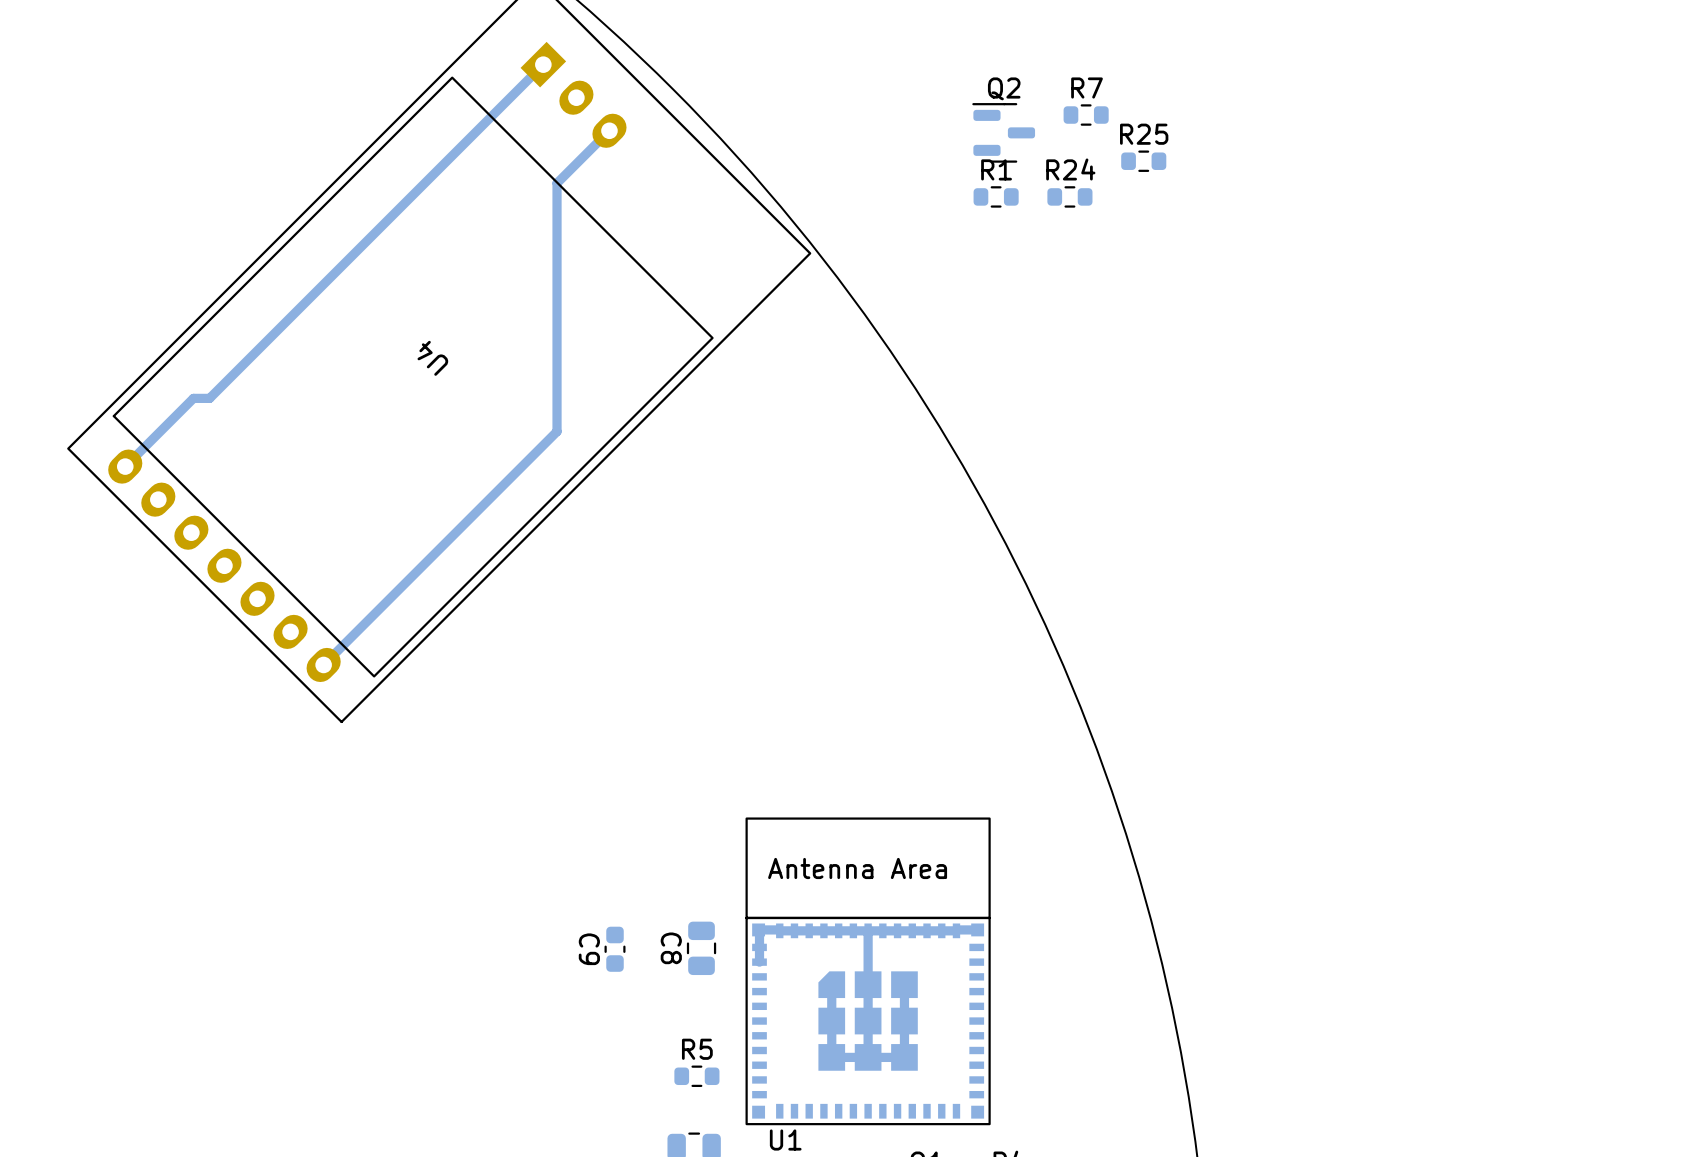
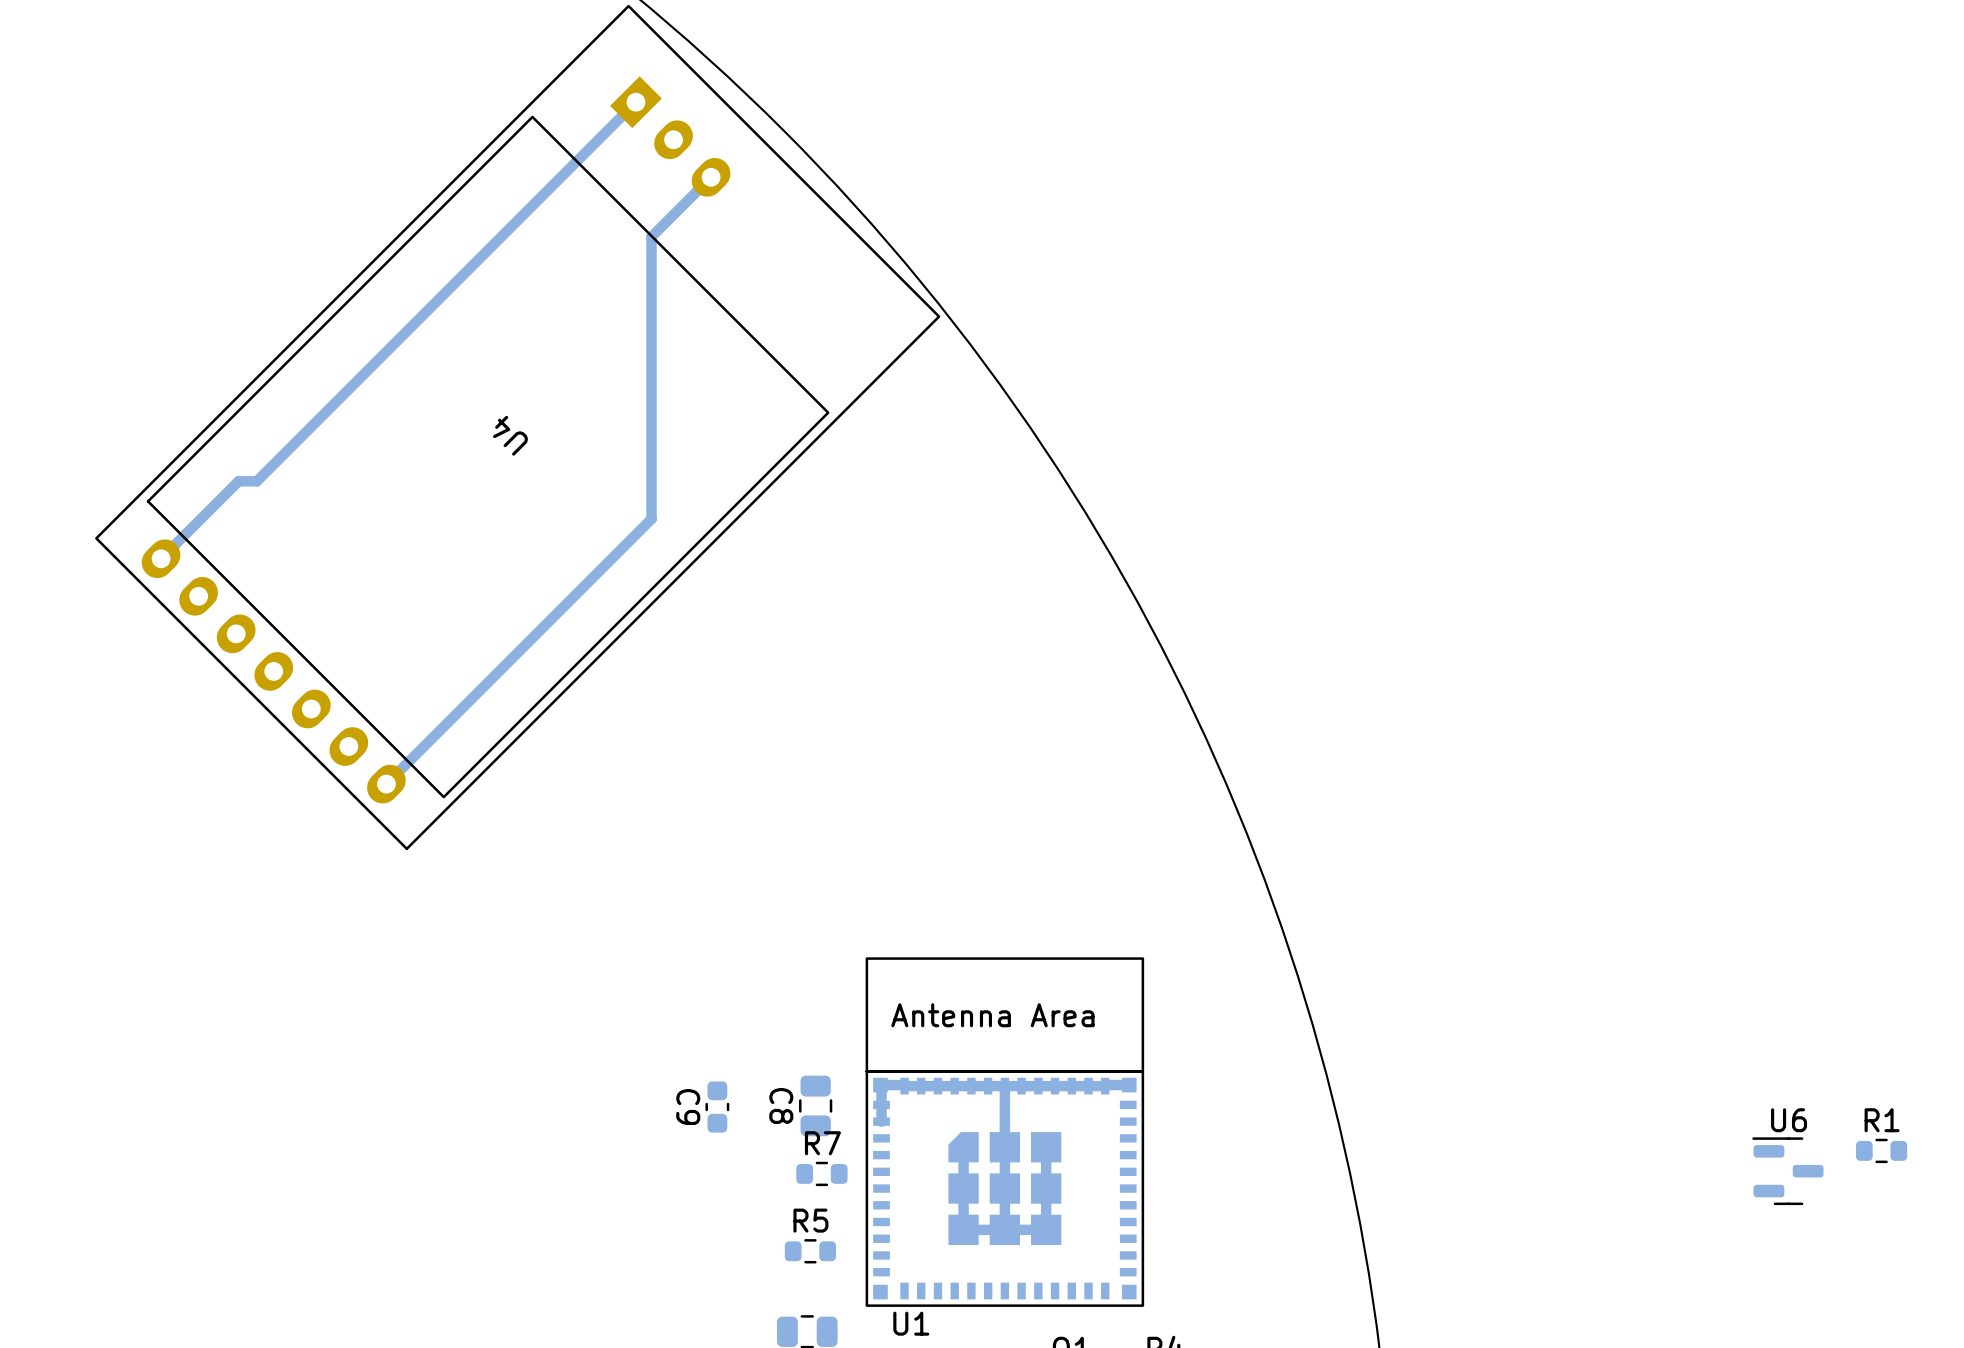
R7 position: (1086, 115) -> (821, 1173)
Q2: (1003, 132) -> none
R25: (1143, 161) -> none
R1 position: (996, 196) -> (1881, 1150)
R24: (1069, 196) -> none
U6: none -> (1787, 1171)

